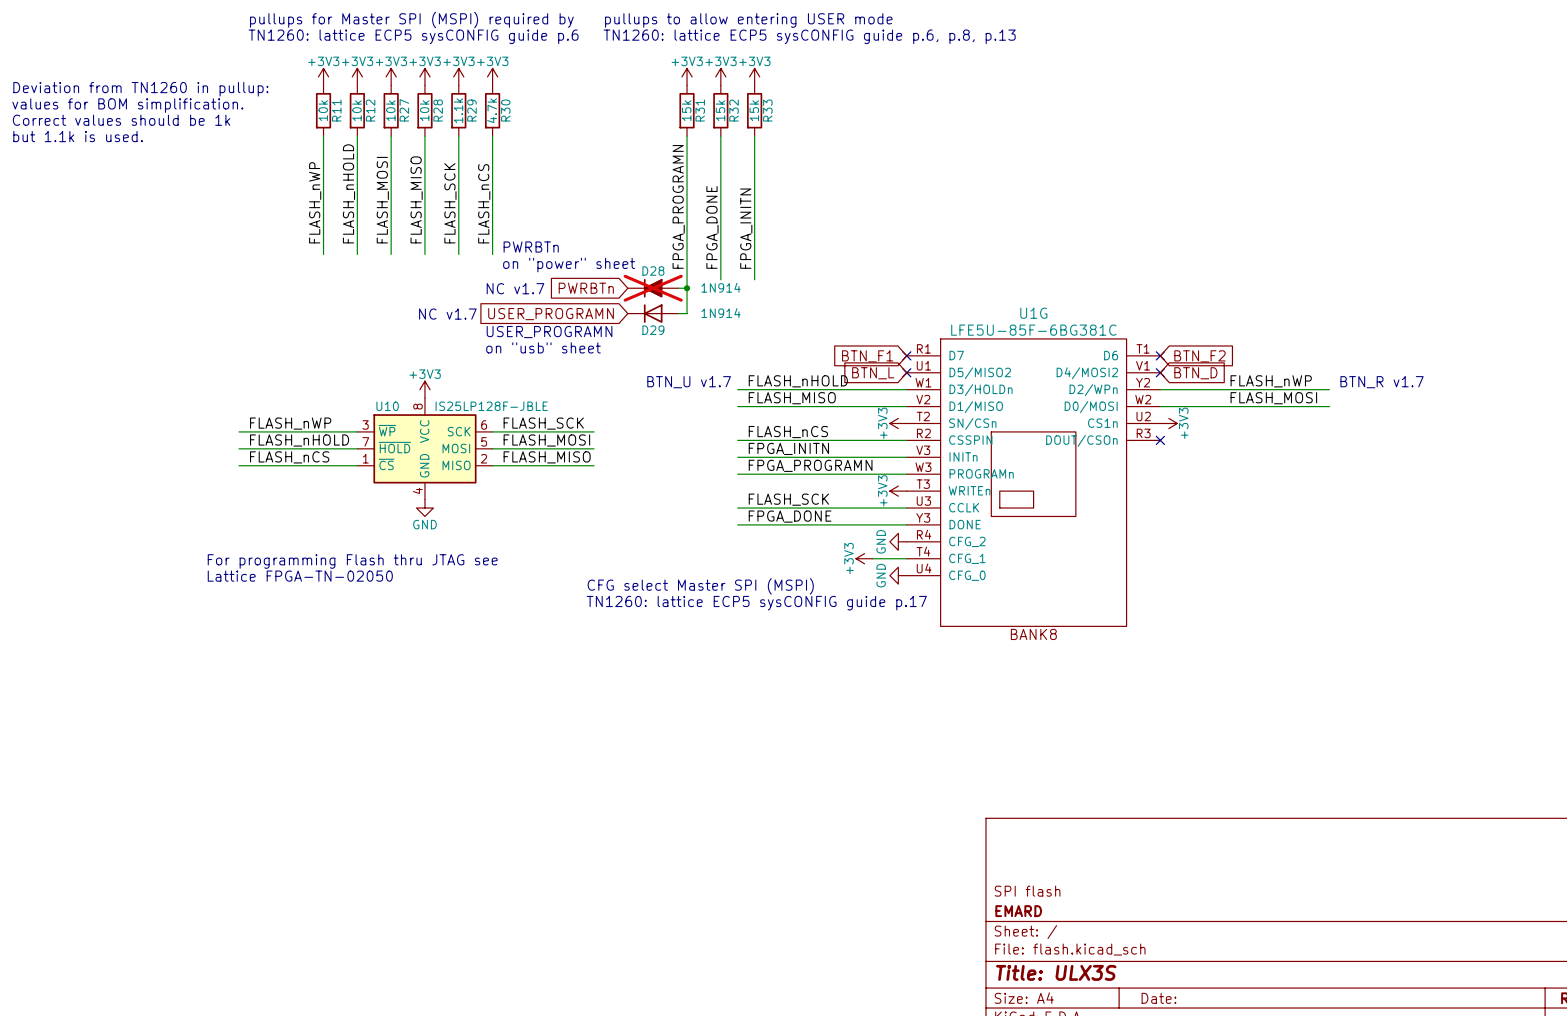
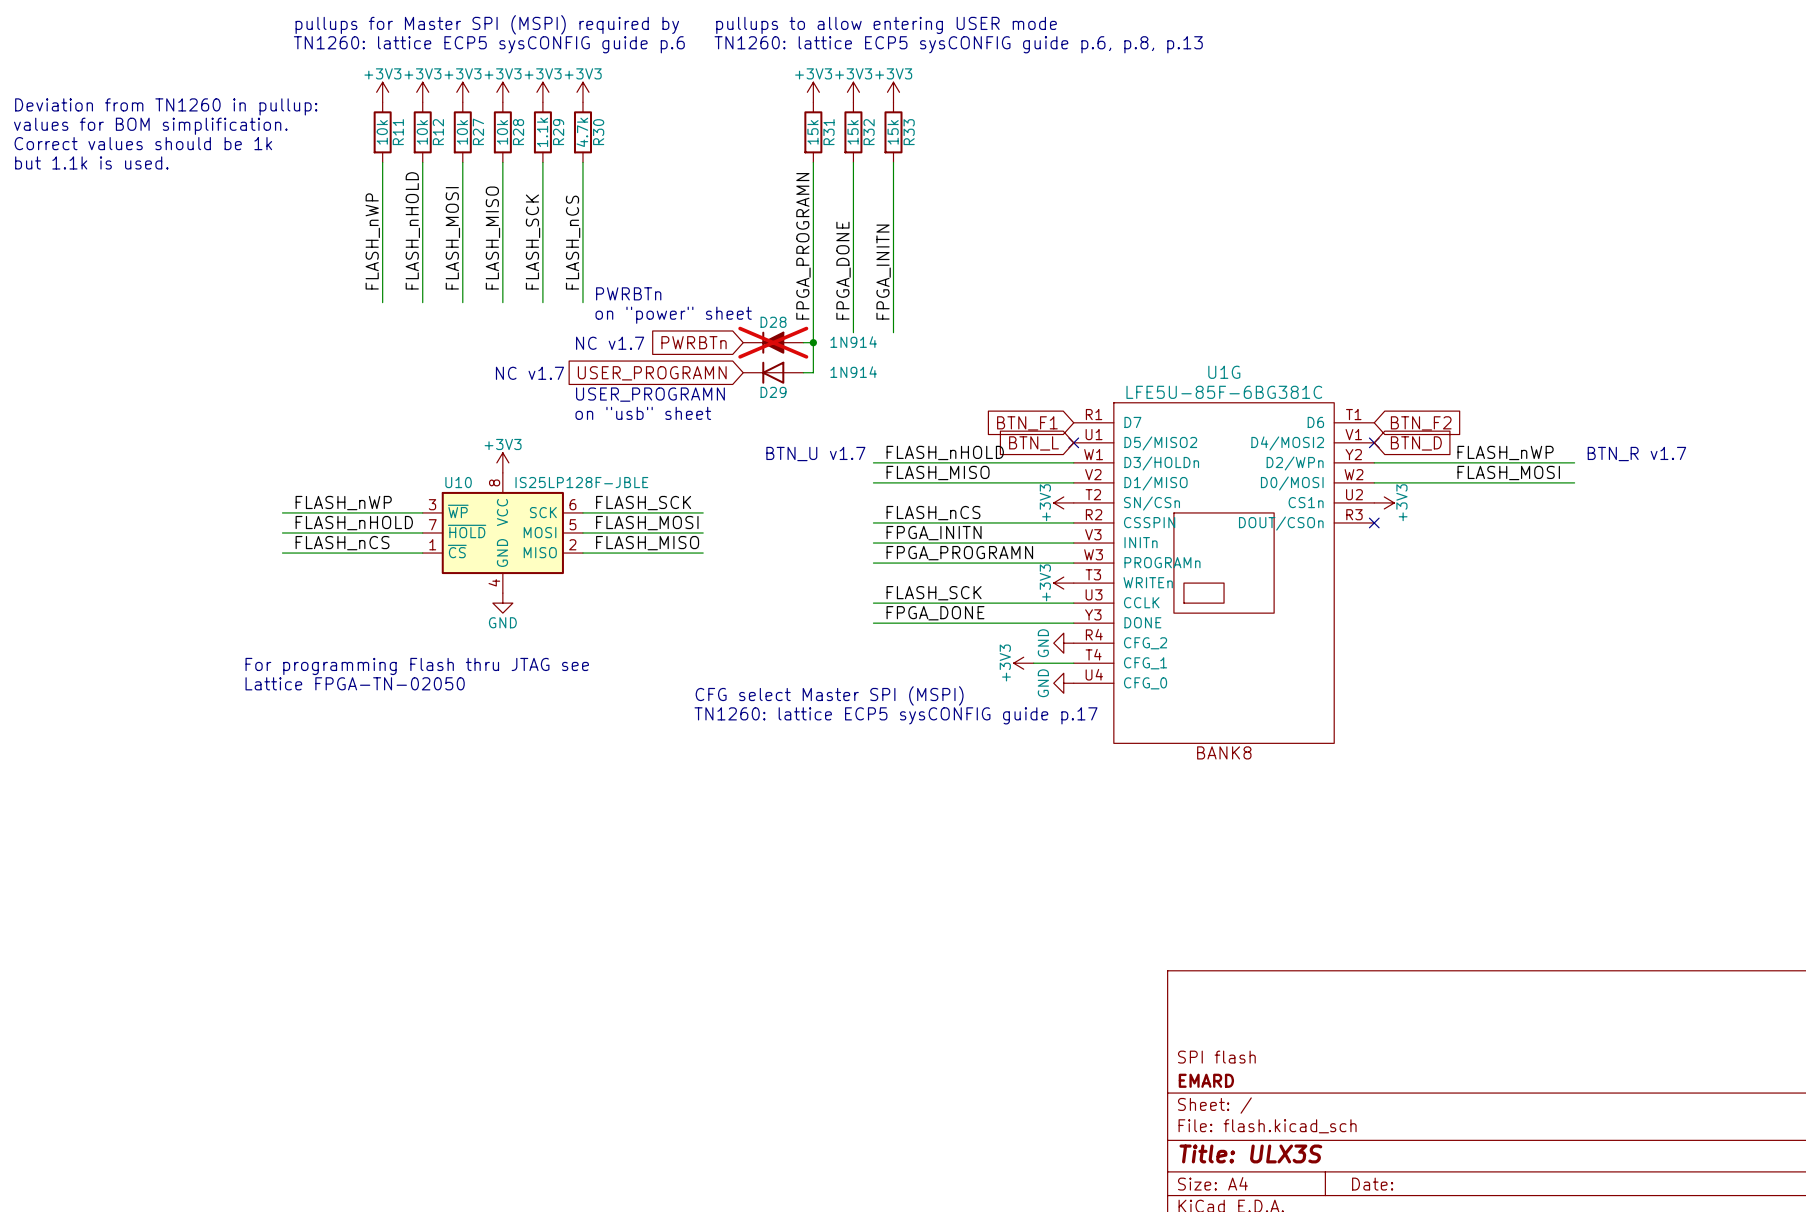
no-connect mark: (906, 355) -> none
no-connect mark: (1160, 355) -> none

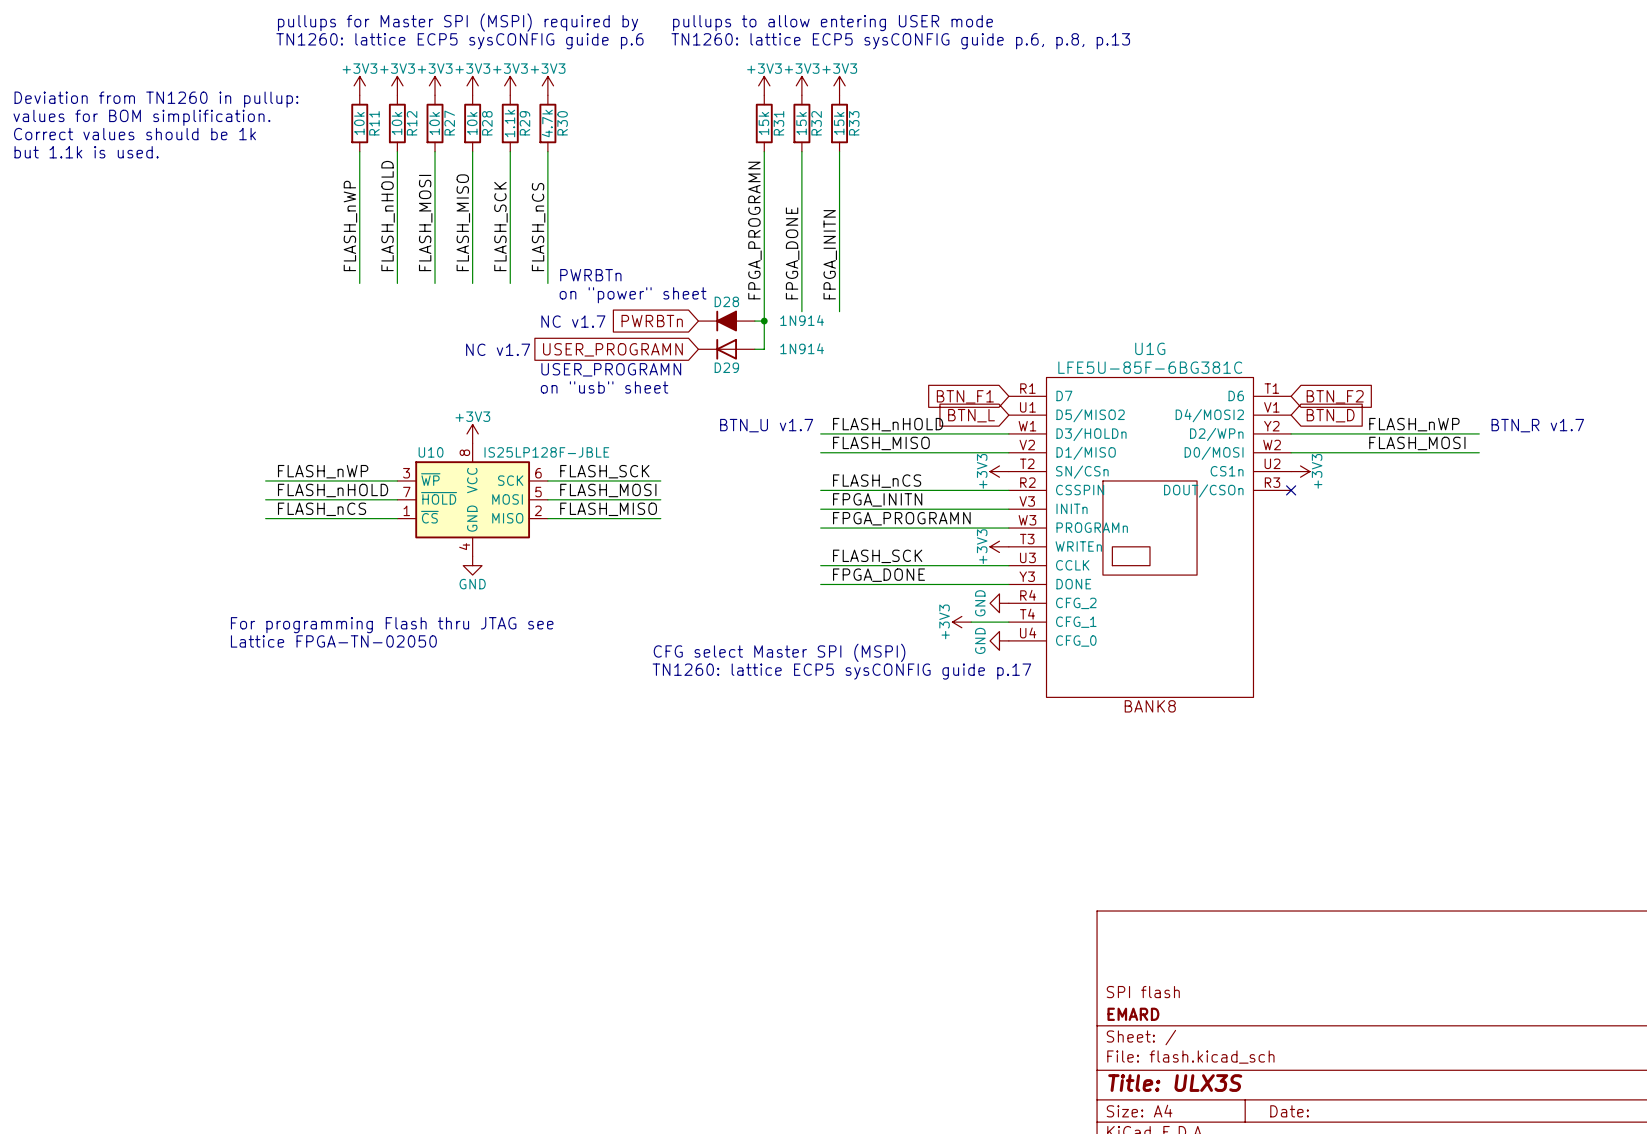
D28 do-not-place cross: (773, 342) -> none
no-connect mark: (1073, 442) -> none
no-connect mark: (1374, 442) -> none

